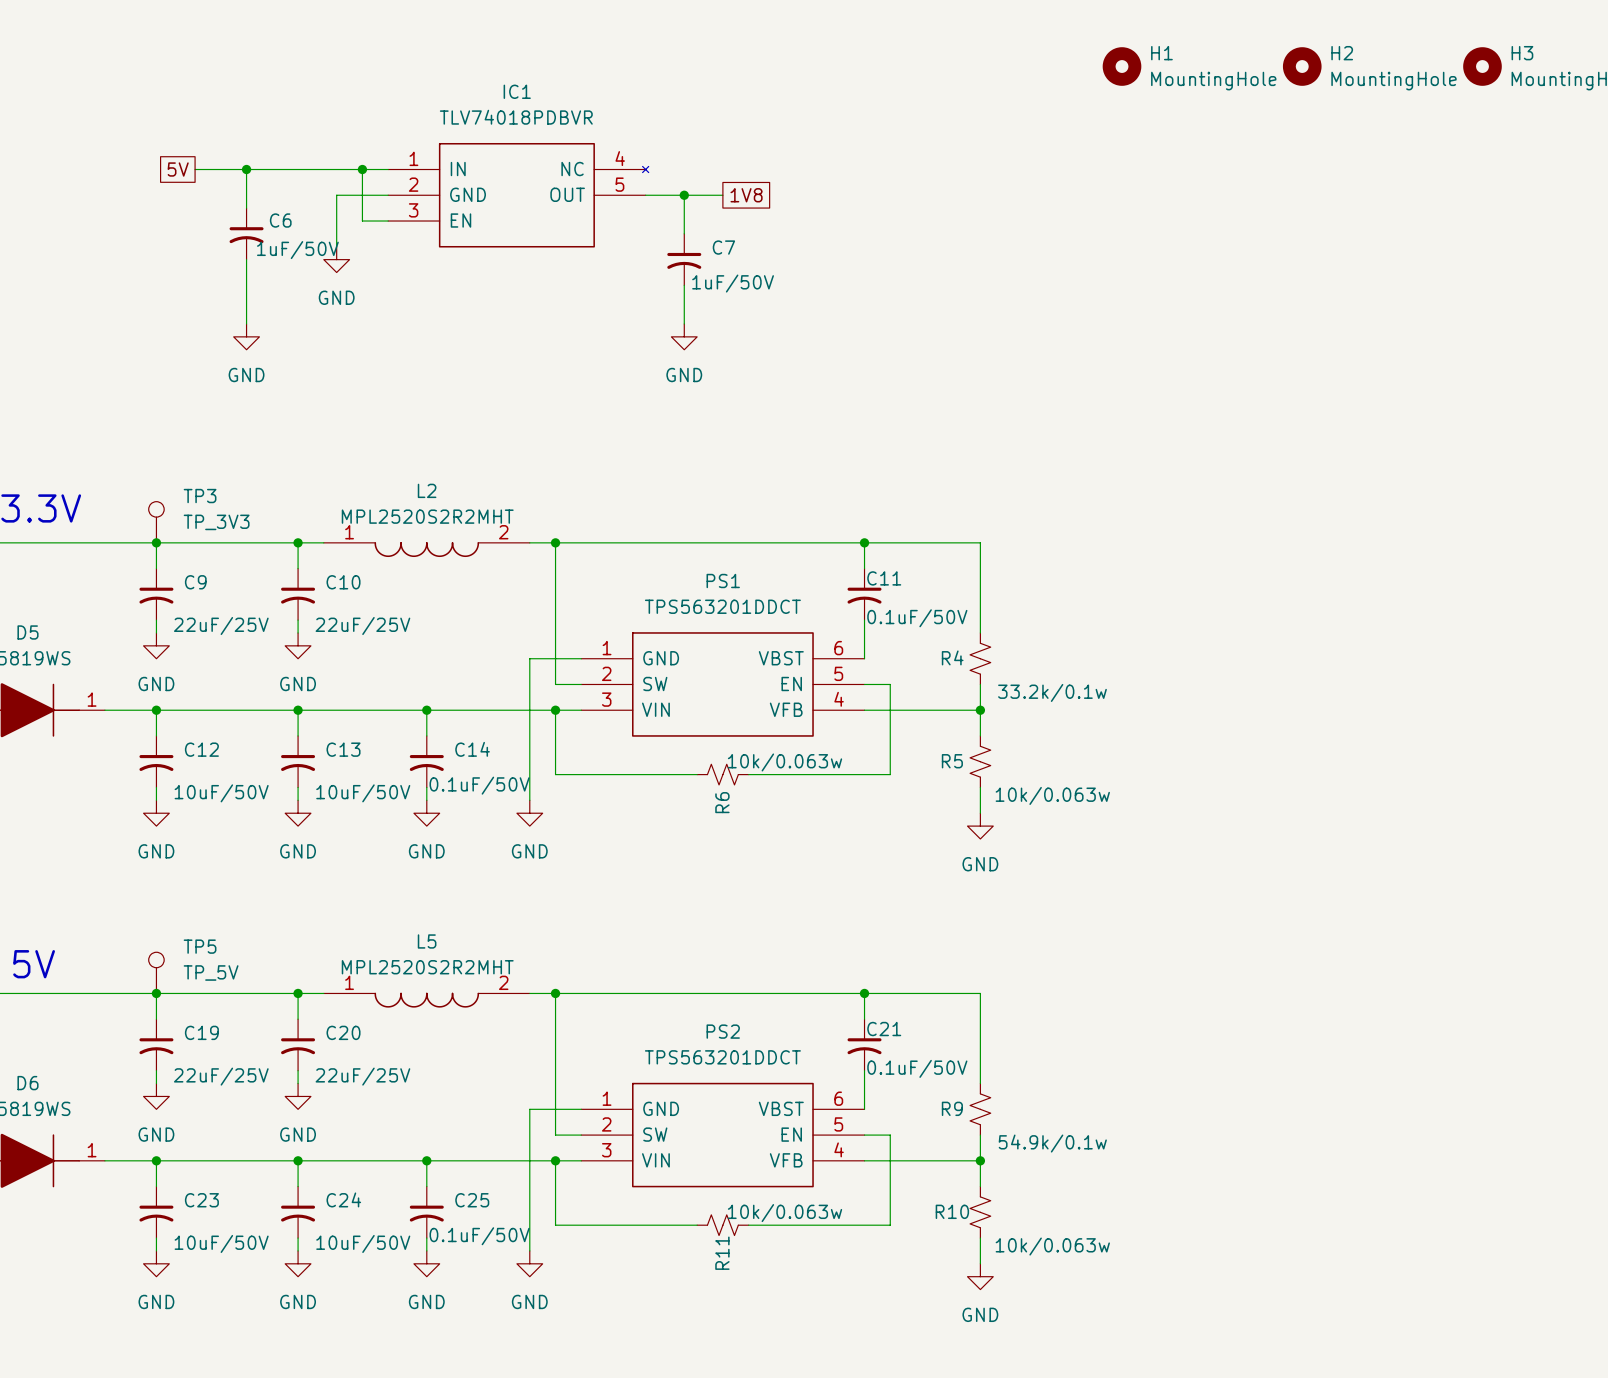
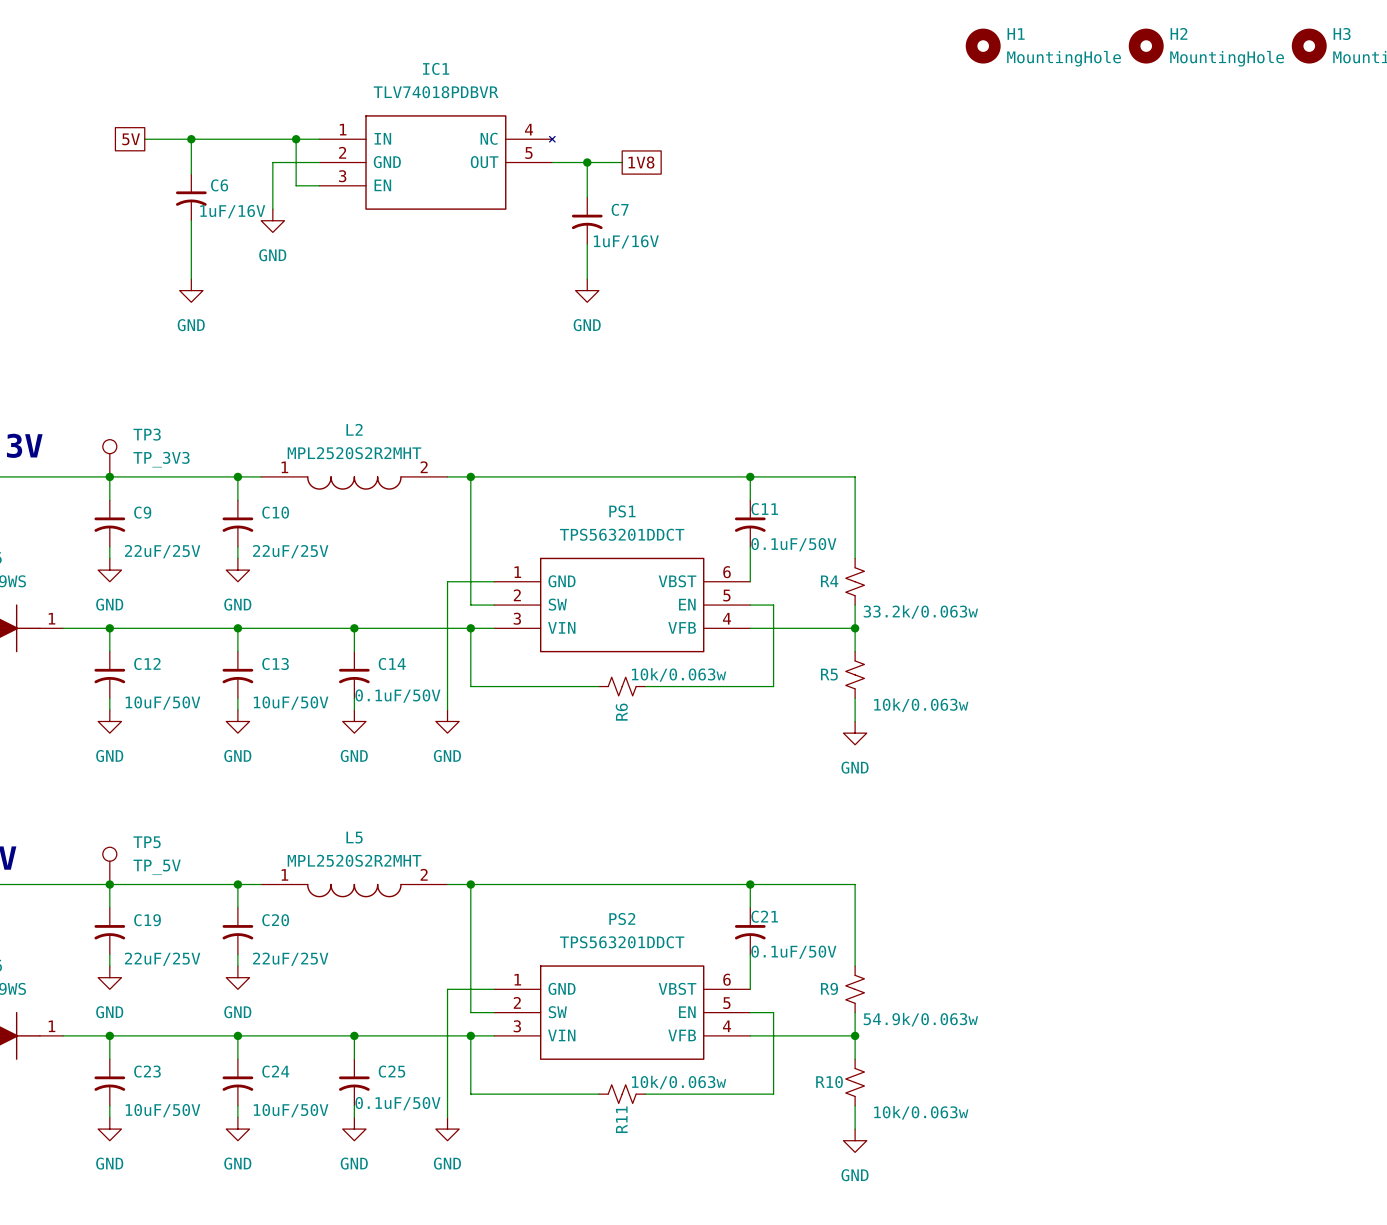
C6 value: 1uF/50V (297, 250) -> 1uF/16V (232, 211)
C7 value: 1uF/50V (733, 283) -> 1uF/16V (626, 241)
R4 value: 33.2k/0.1w (1052, 692) -> 33.2k/0.063w (920, 612)
R9 value: 54.9k/0.1w (1052, 1143) -> 54.9k/0.063w (920, 1019)

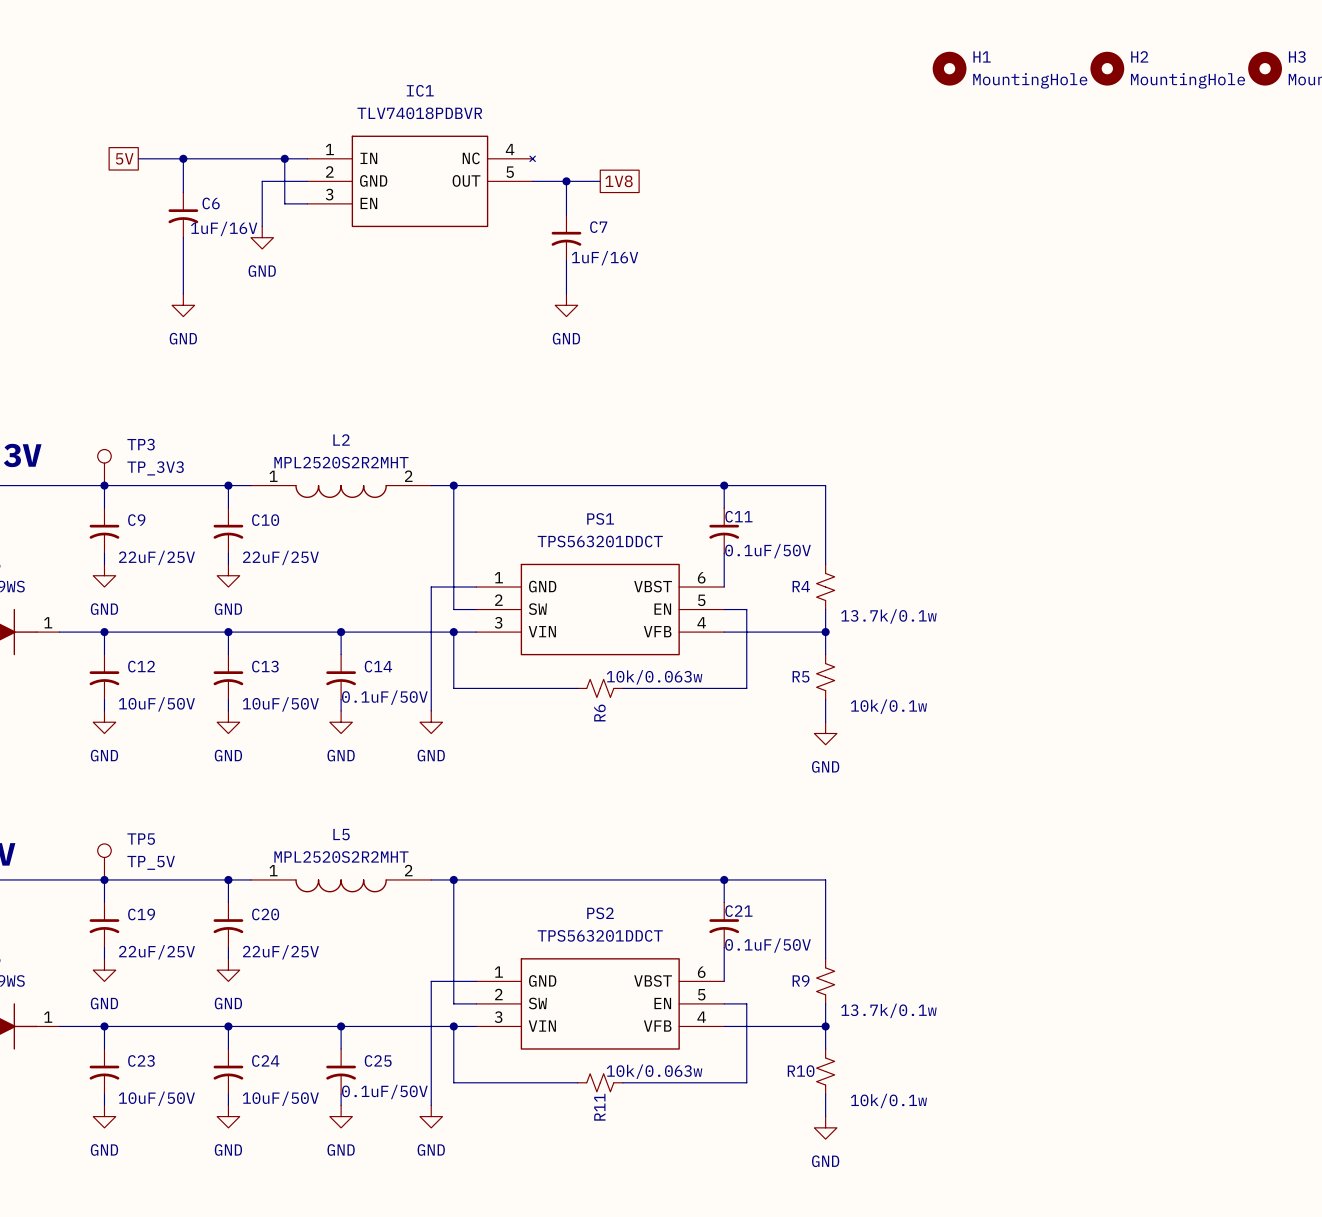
R4 value: 33.2k/0.063w (920, 612) -> 13.7k/0.1w (888, 616)
R5 value: 10k/0.063w (921, 705) -> 10k/0.1w (888, 706)
R9 value: 54.9k/0.063w (920, 1019) -> 13.7k/0.1w (888, 1010)
R10 value: 10k/0.063w (921, 1112) -> 10k/0.1w (888, 1101)

